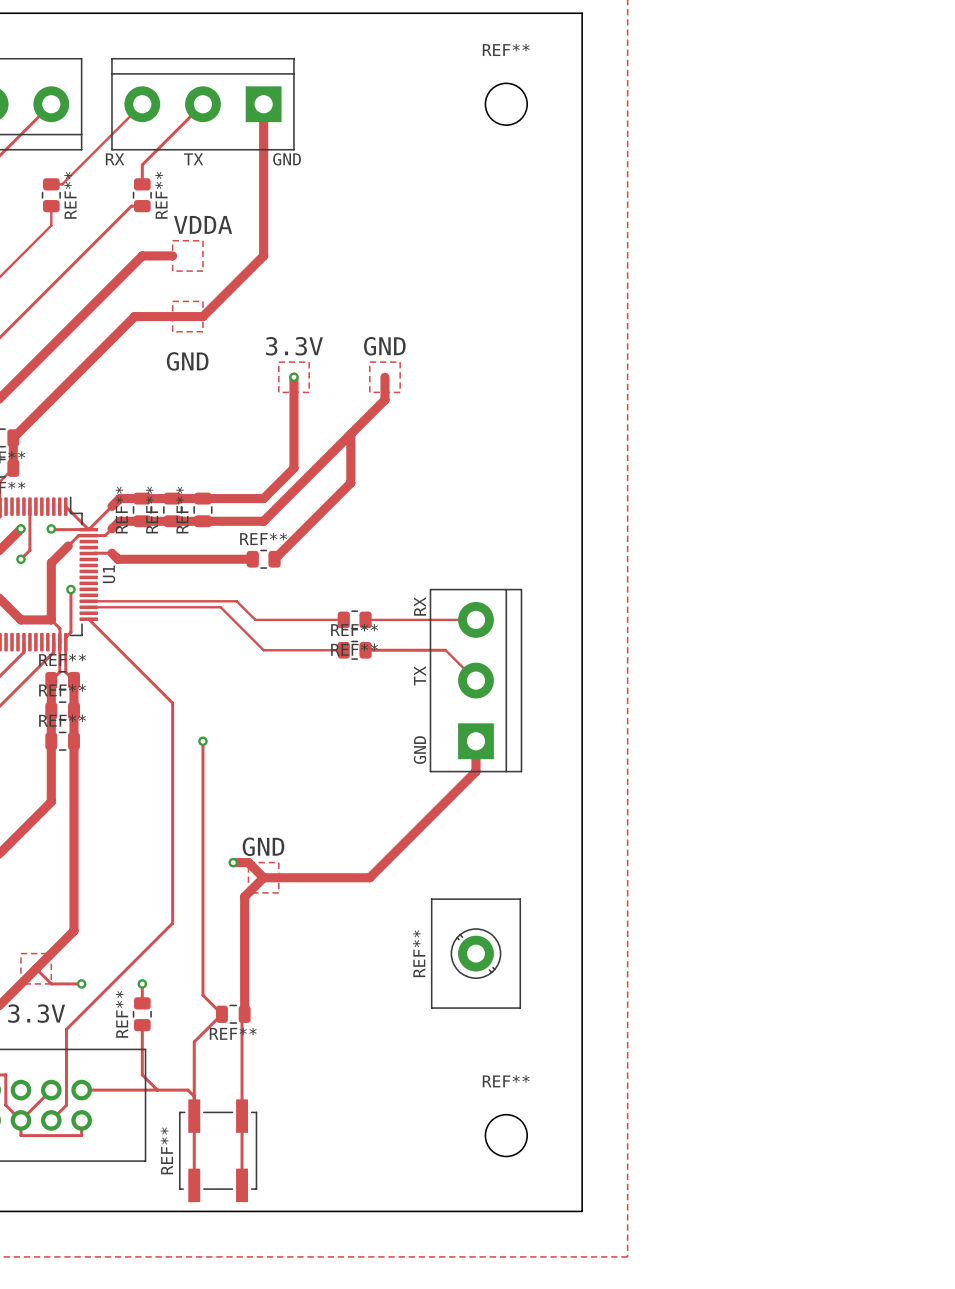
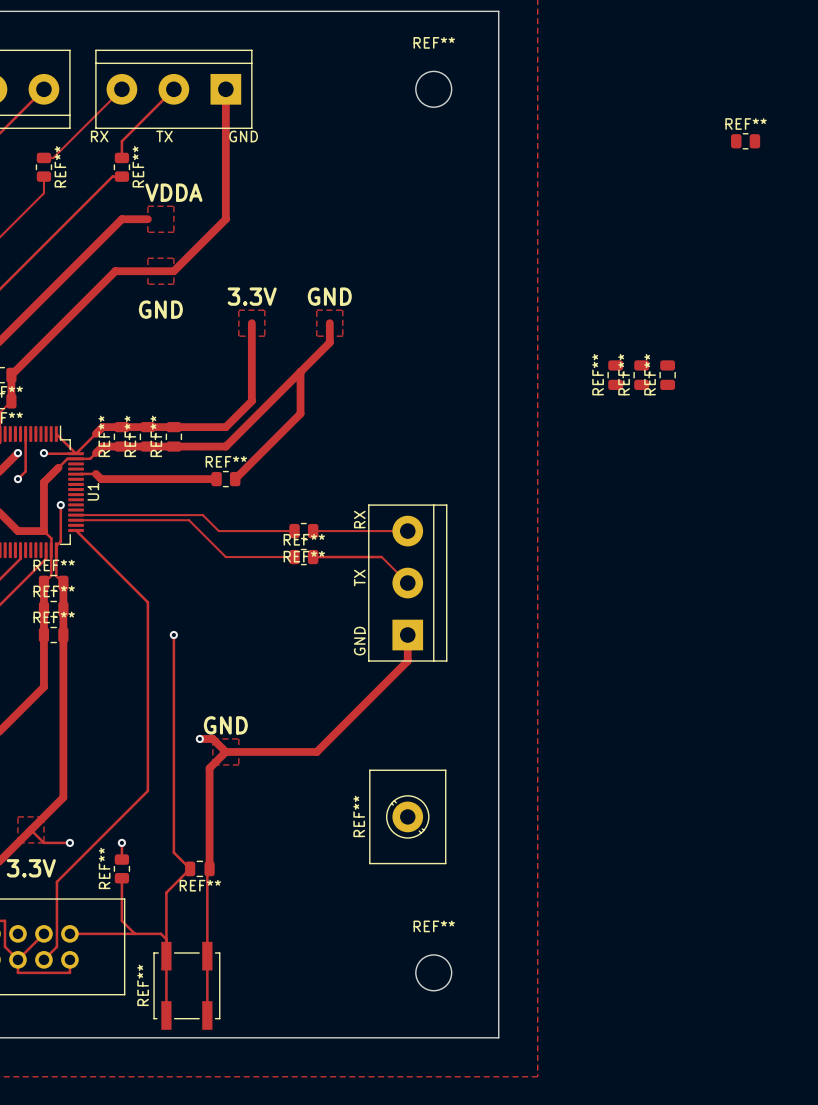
REF**: none -> (745, 141)
via: (293, 377) -> none
REF**: none -> (615, 375)
REF**: none -> (641, 375)
REF**: none -> (667, 375)

